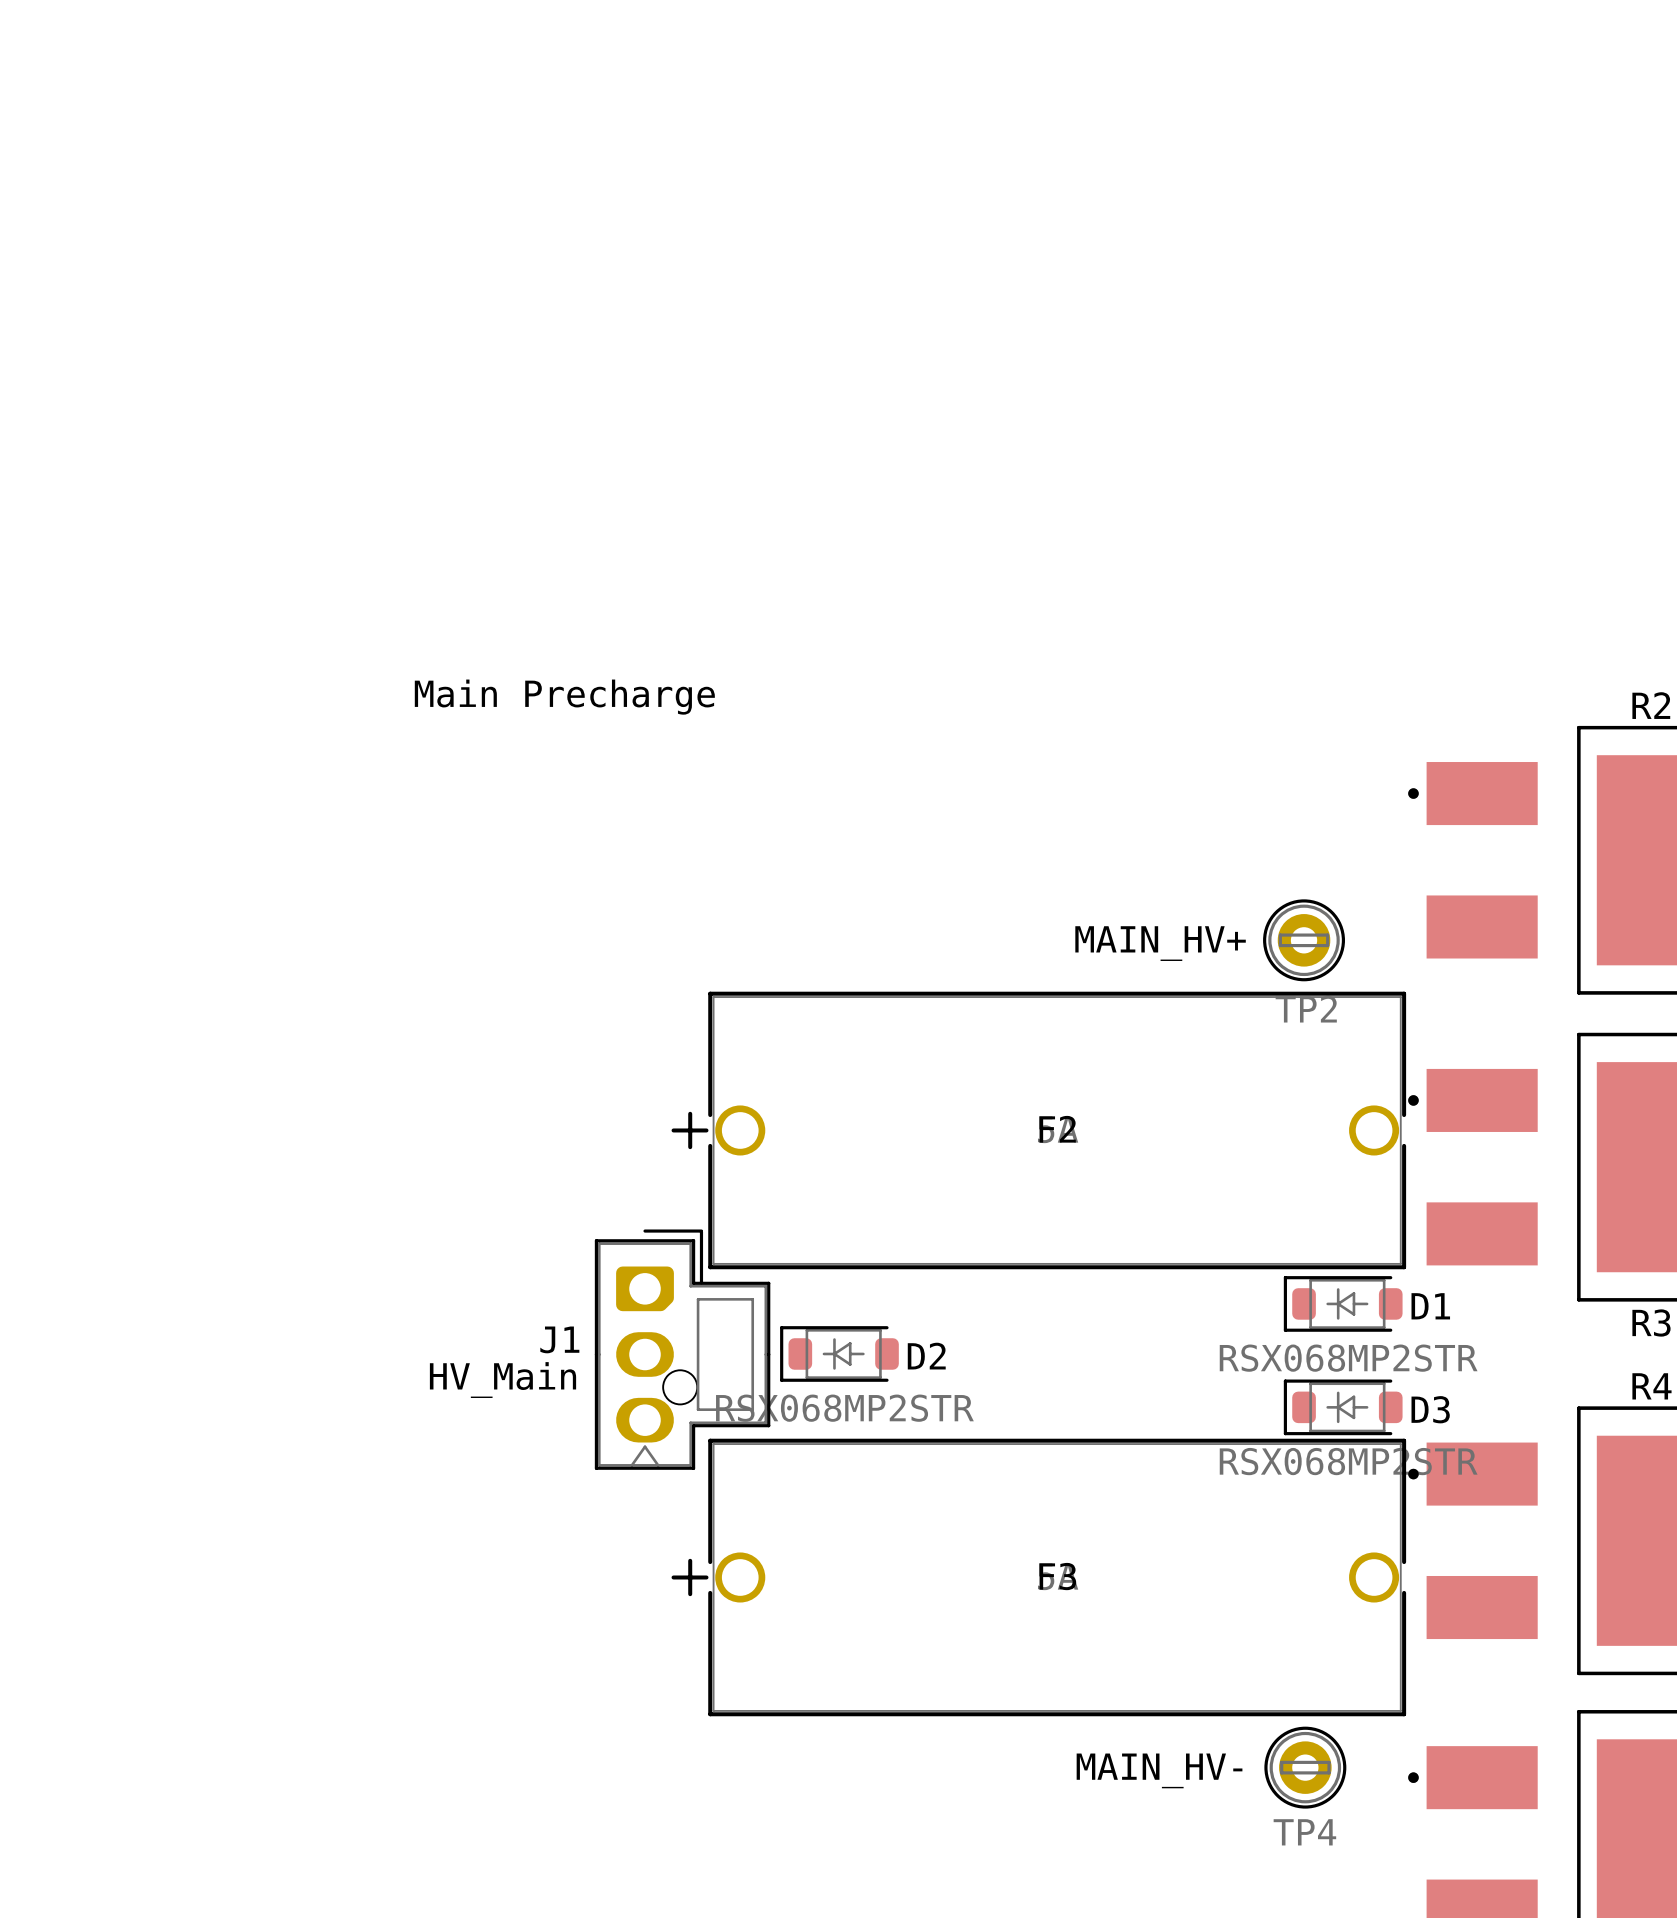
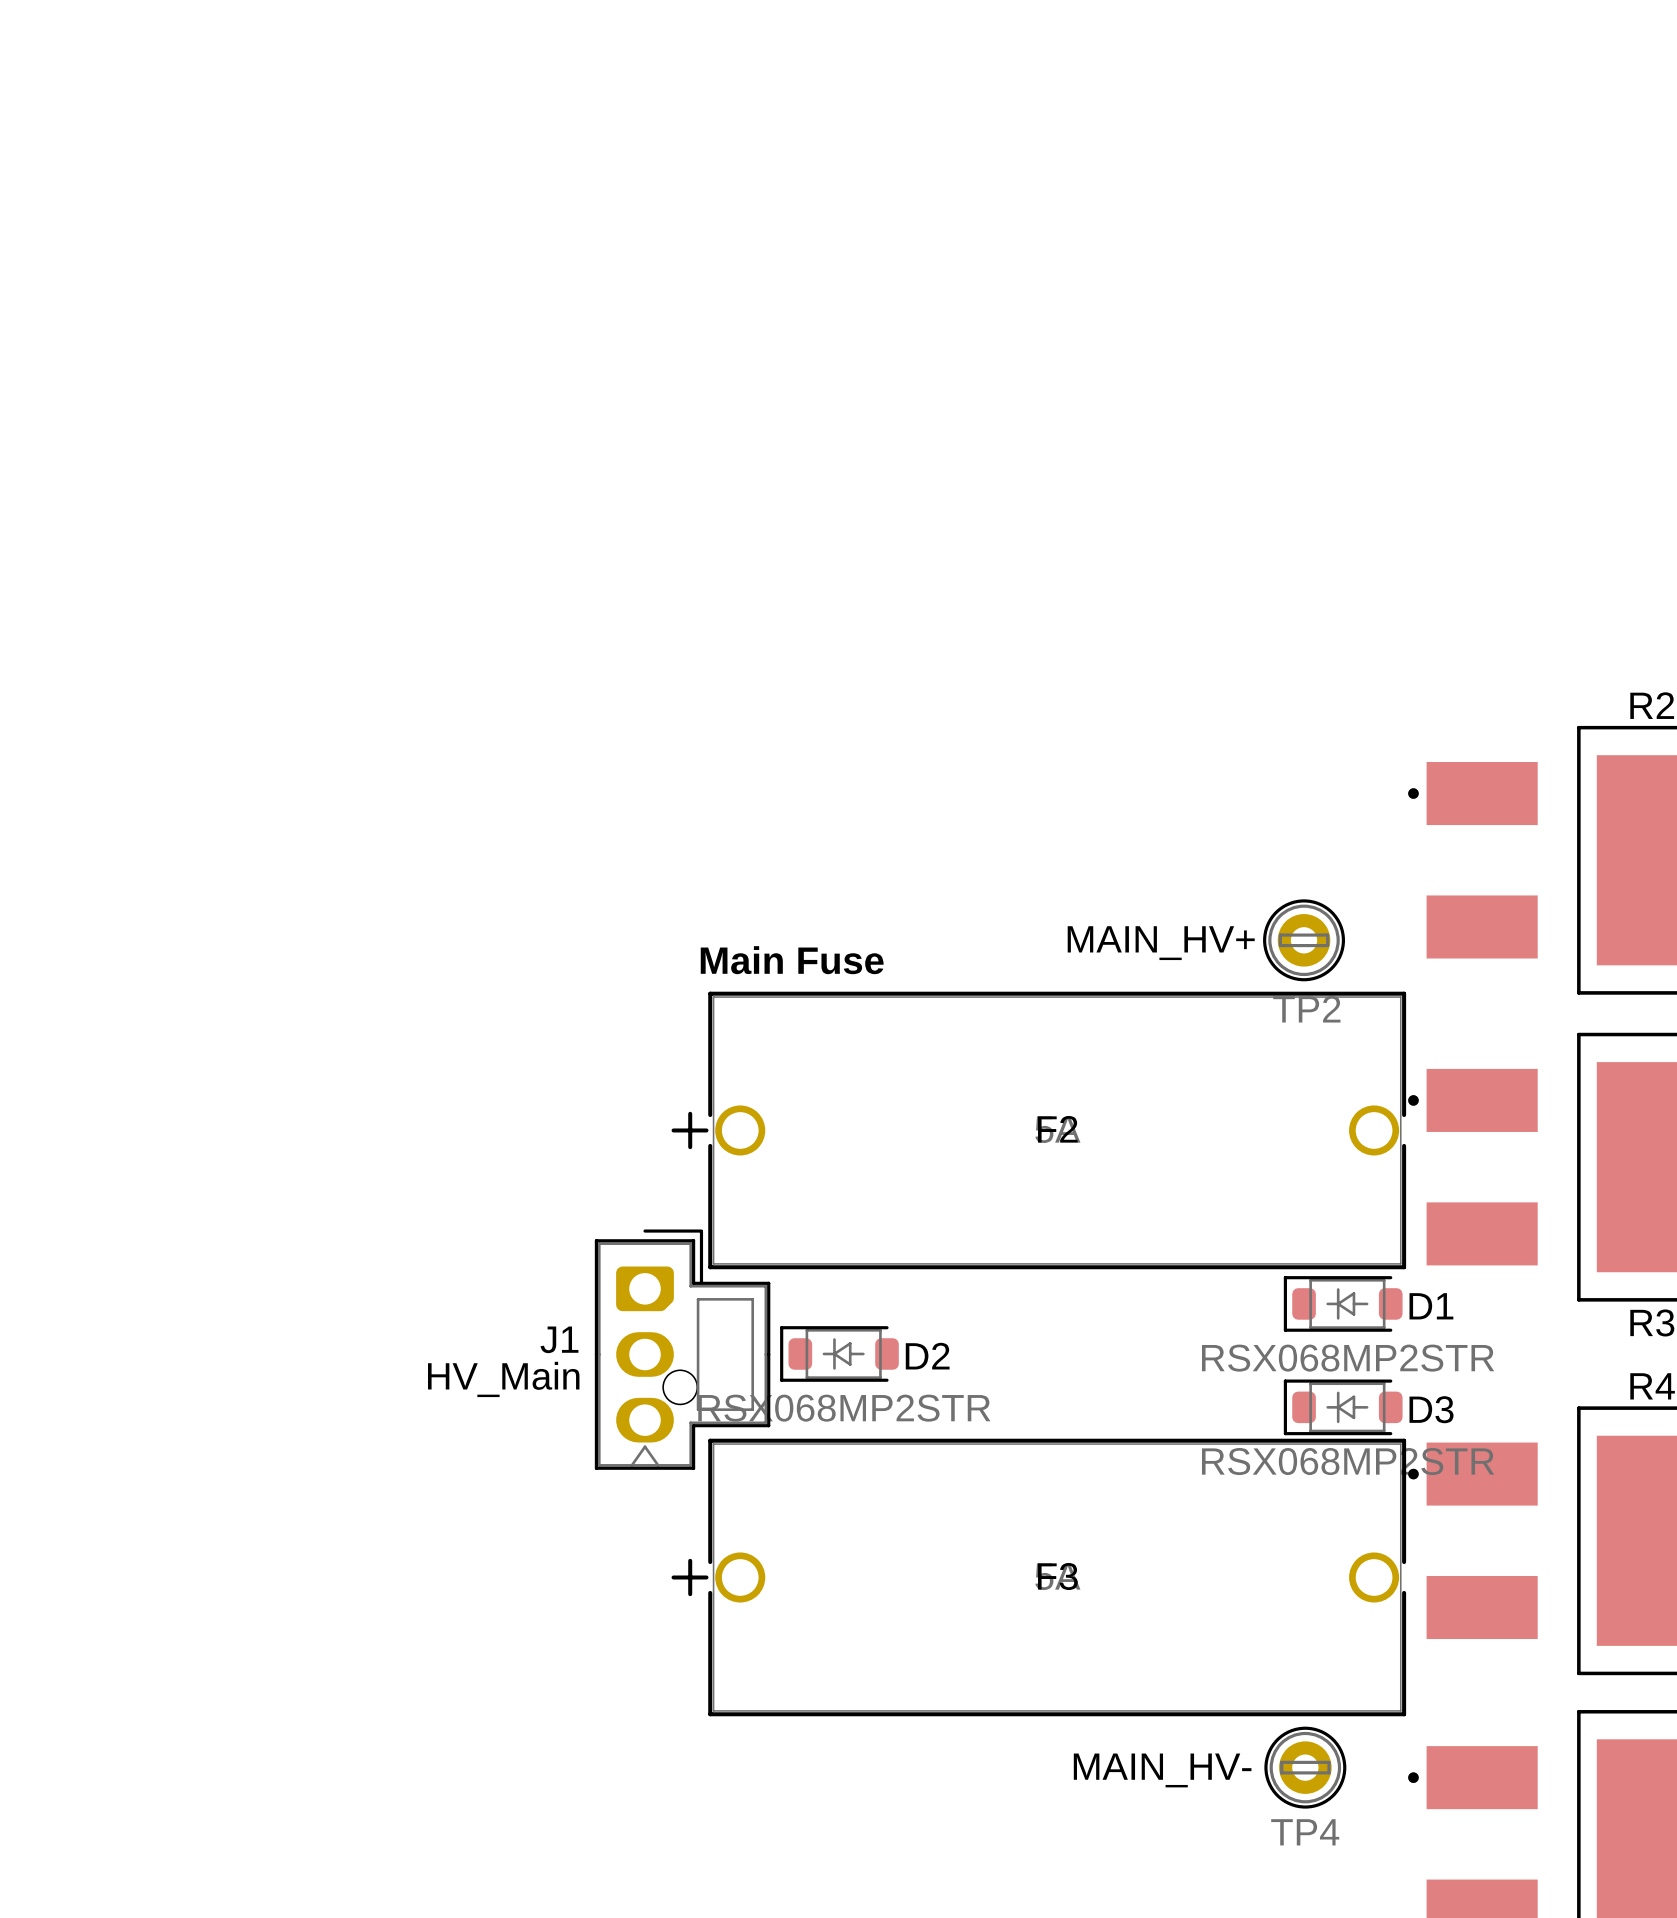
text: Main Precharge (564, 697) -> none
text: none -> Main Fuse (792, 960)

